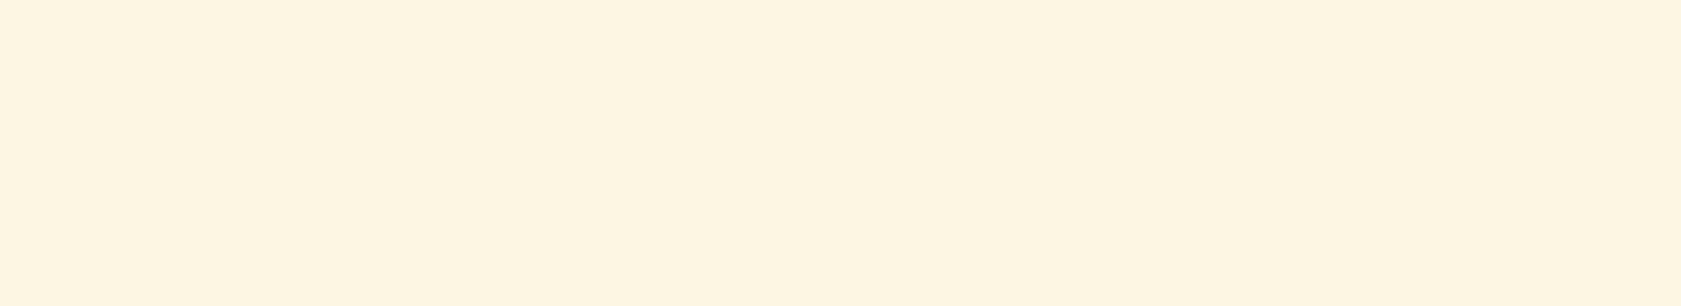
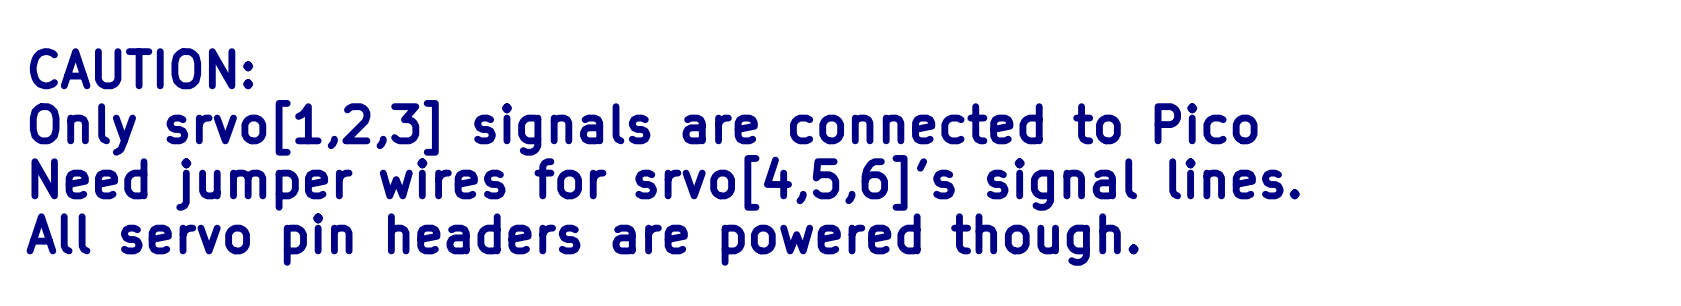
text: none -> CAUTION: (141, 68)
text: none -> Only srvo[1,2,3] signals are connected to Pico (643, 127)
text: none -> Need jumper wires for srvo[4,5,6]'s signal lines. (665, 182)
text: none -> All servo pin headers are powered though. (582, 239)

